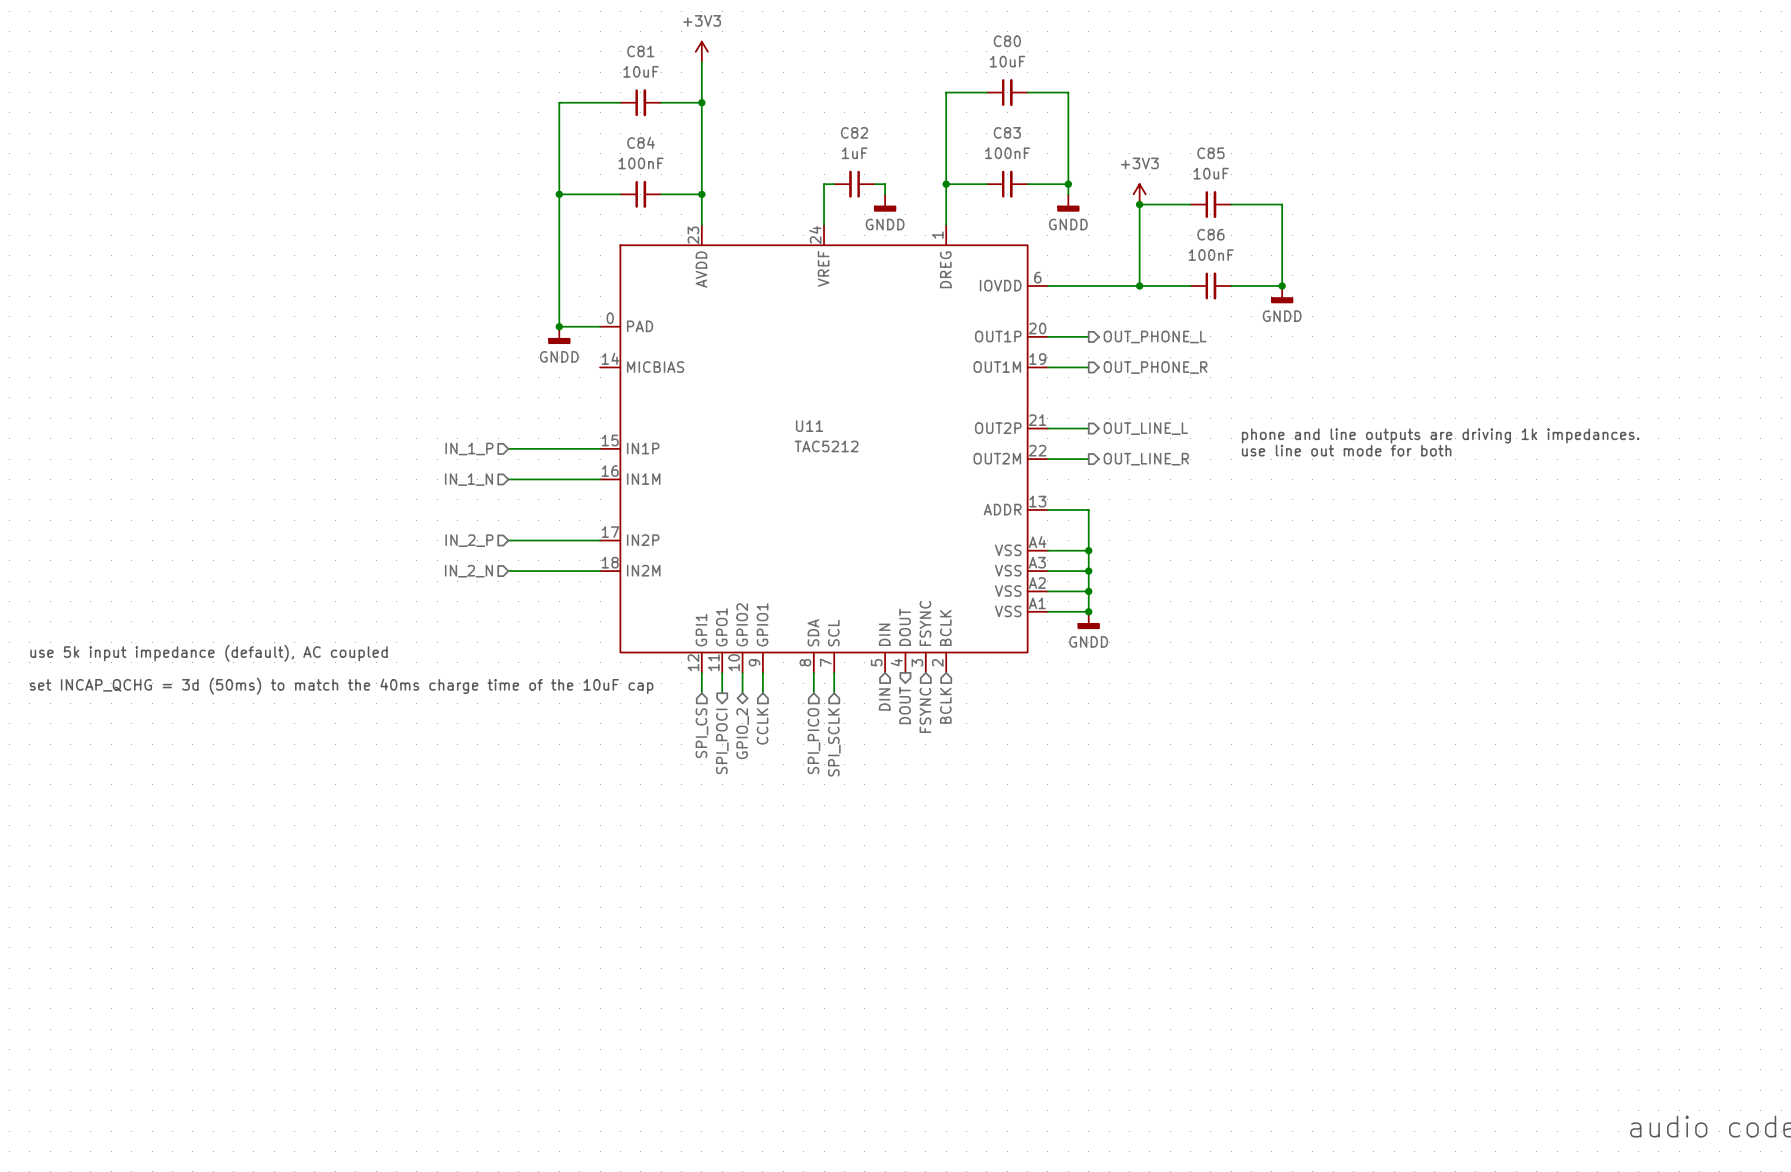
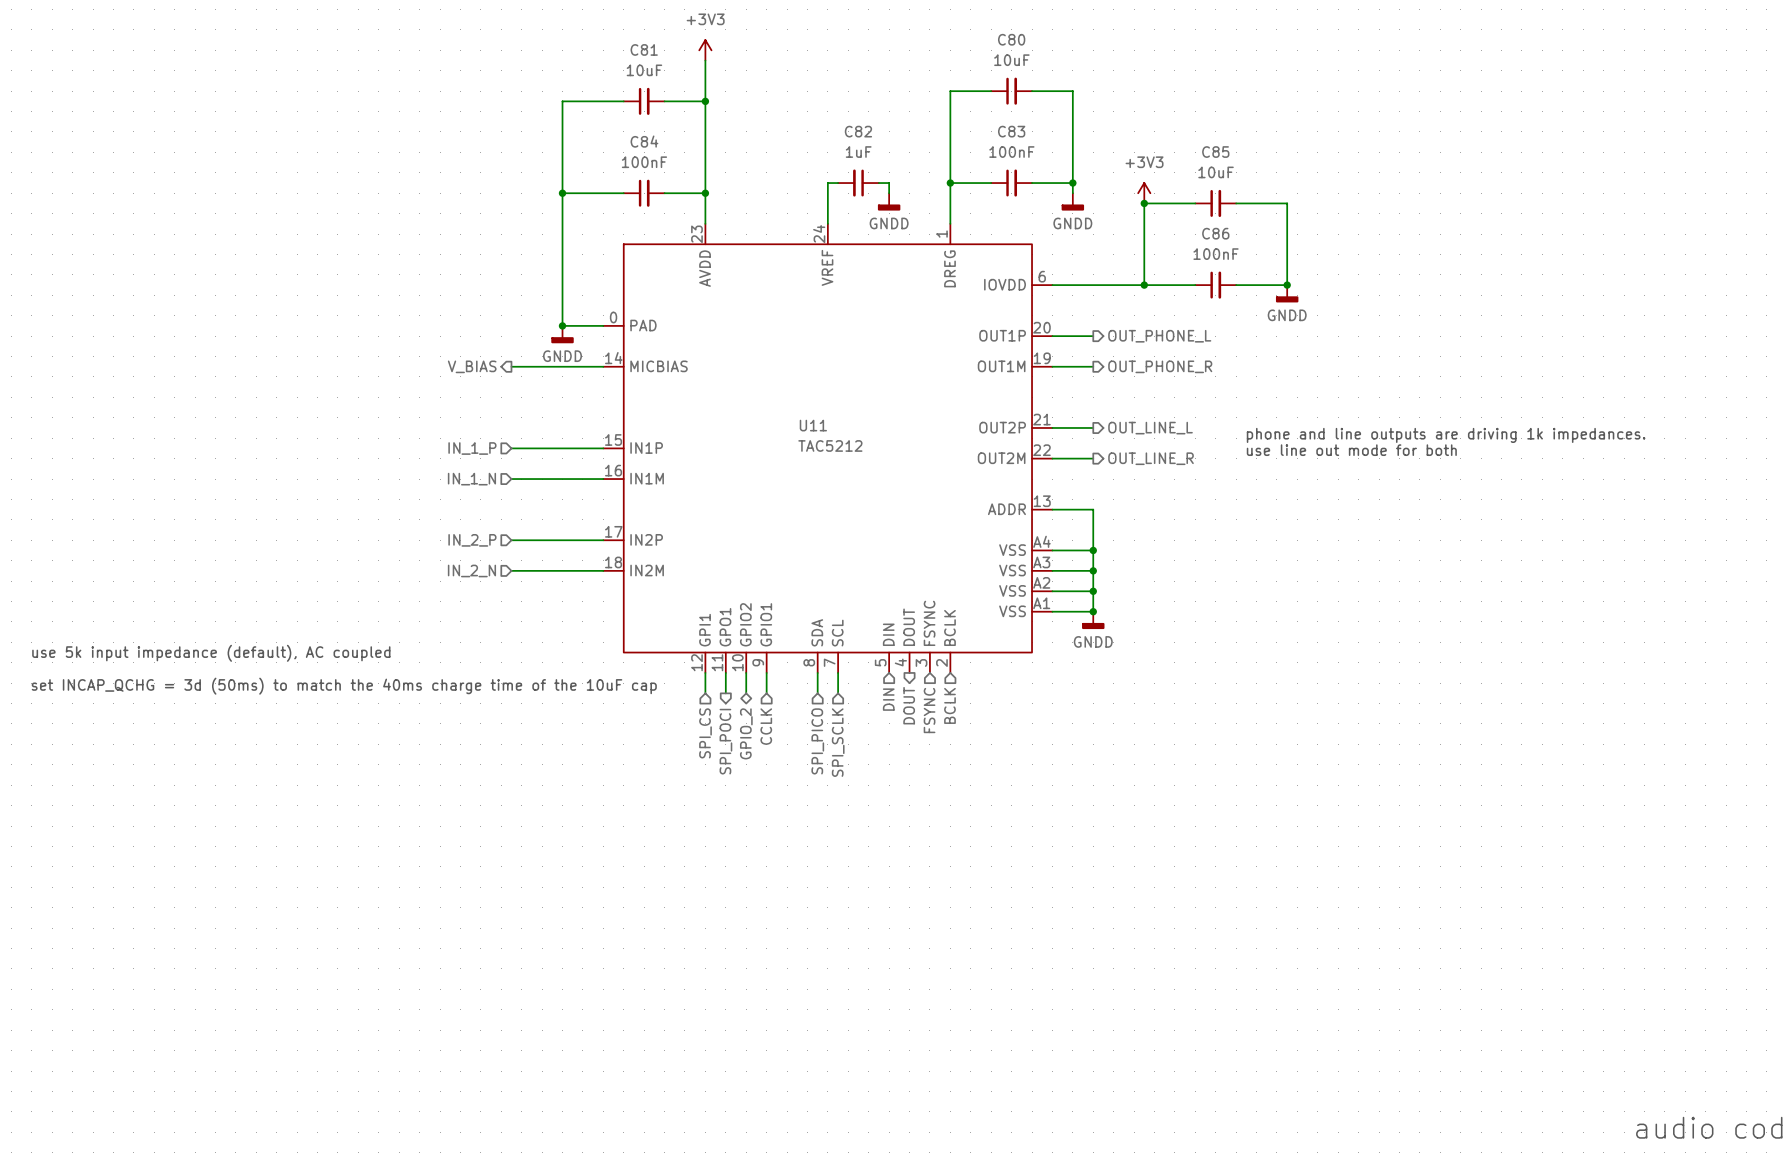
hierarchical label: none -> V_BIAS (472, 366)
wire: none -> (511, 366) (603, 366)

